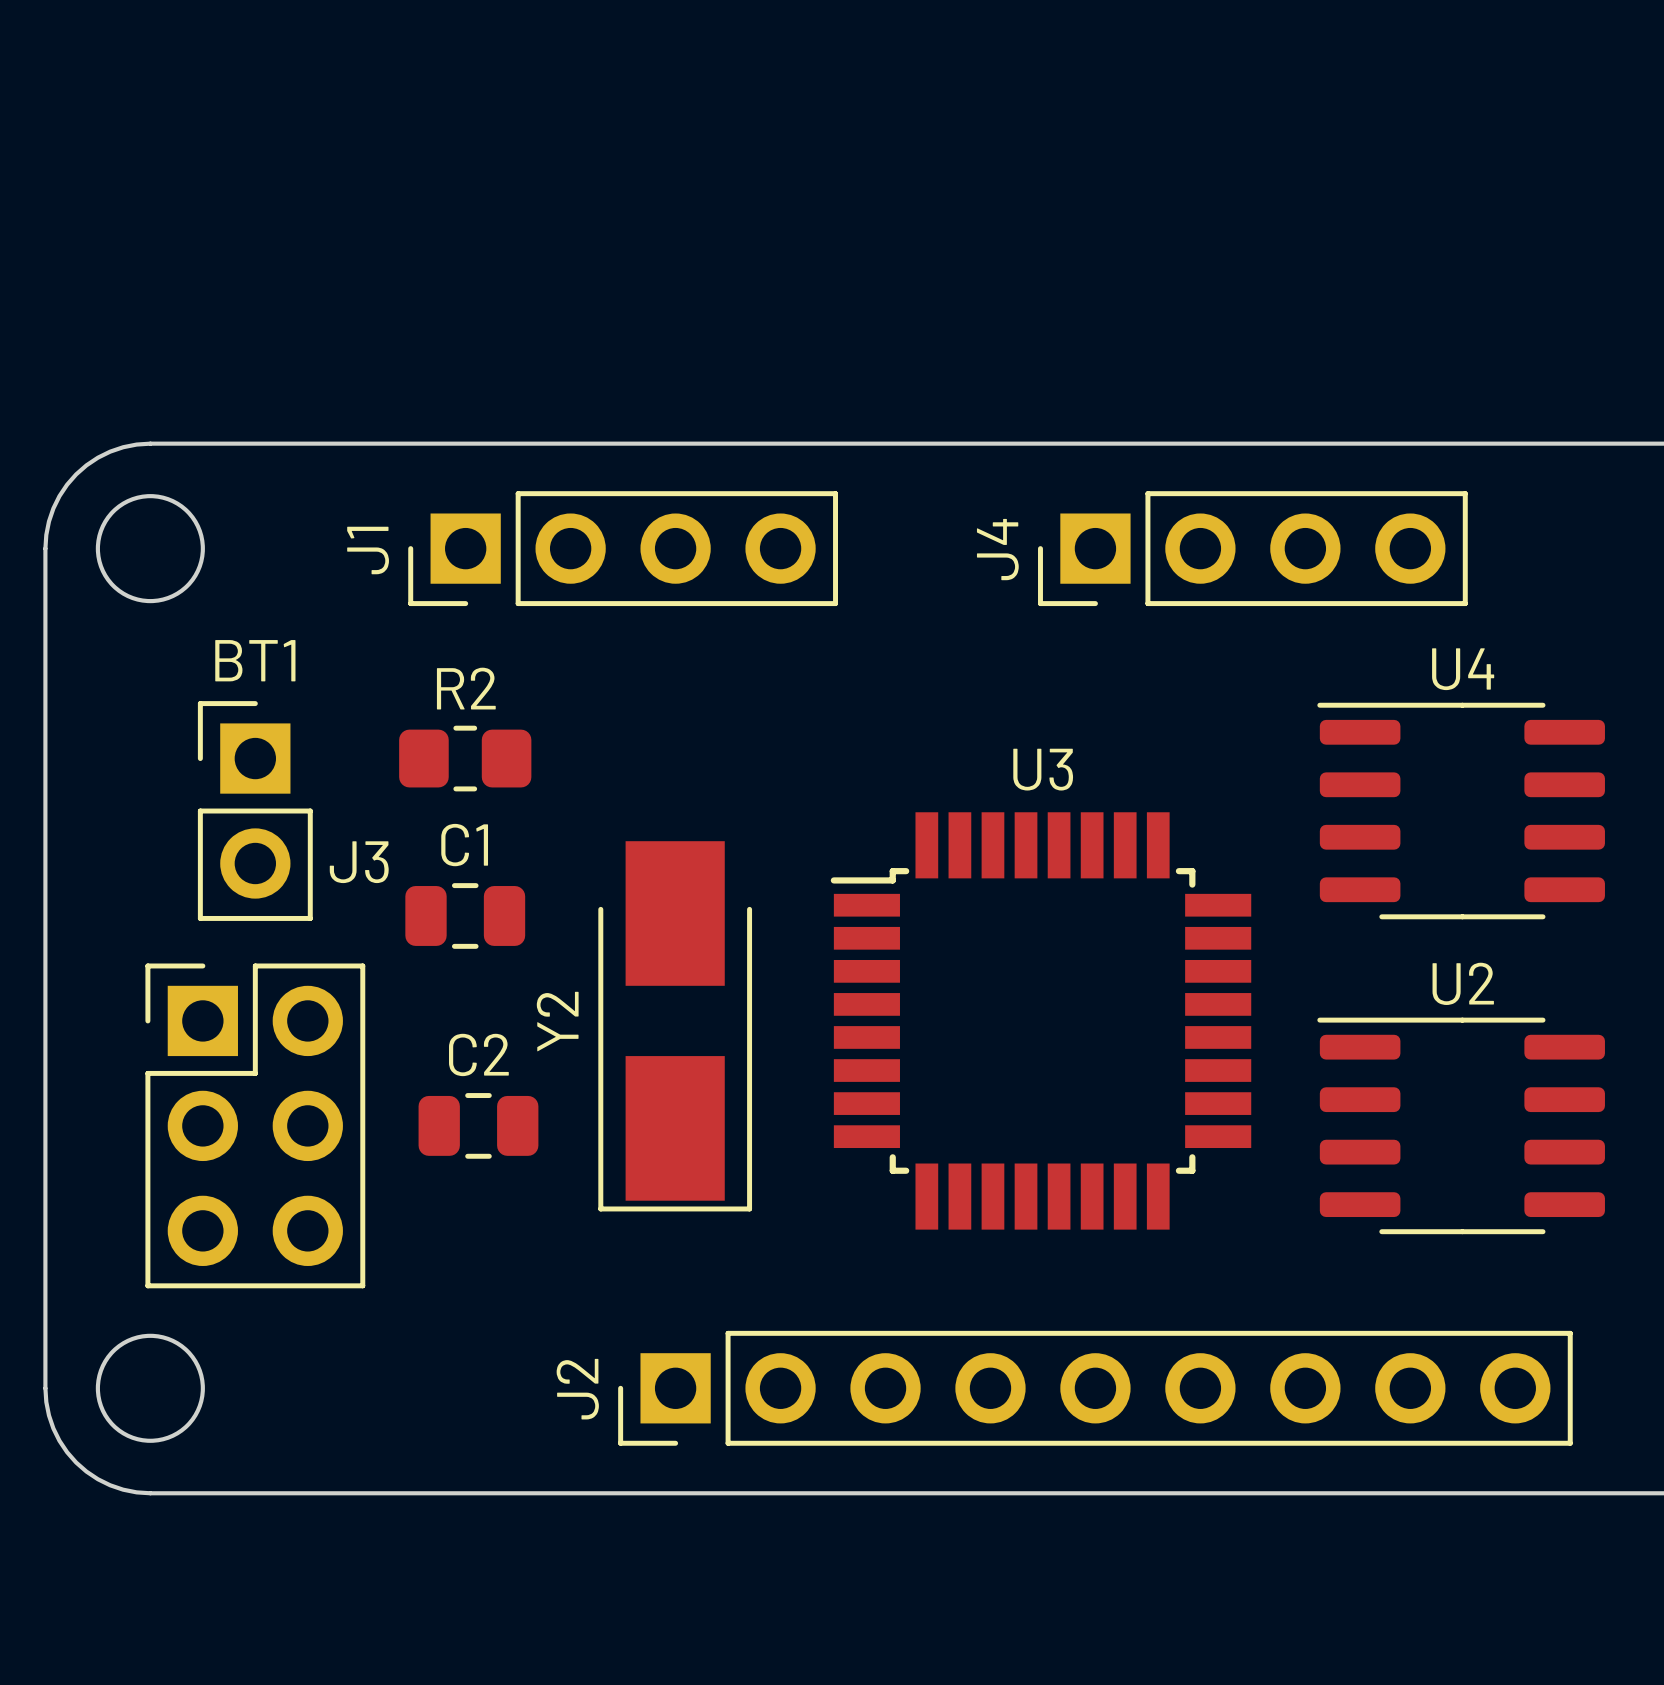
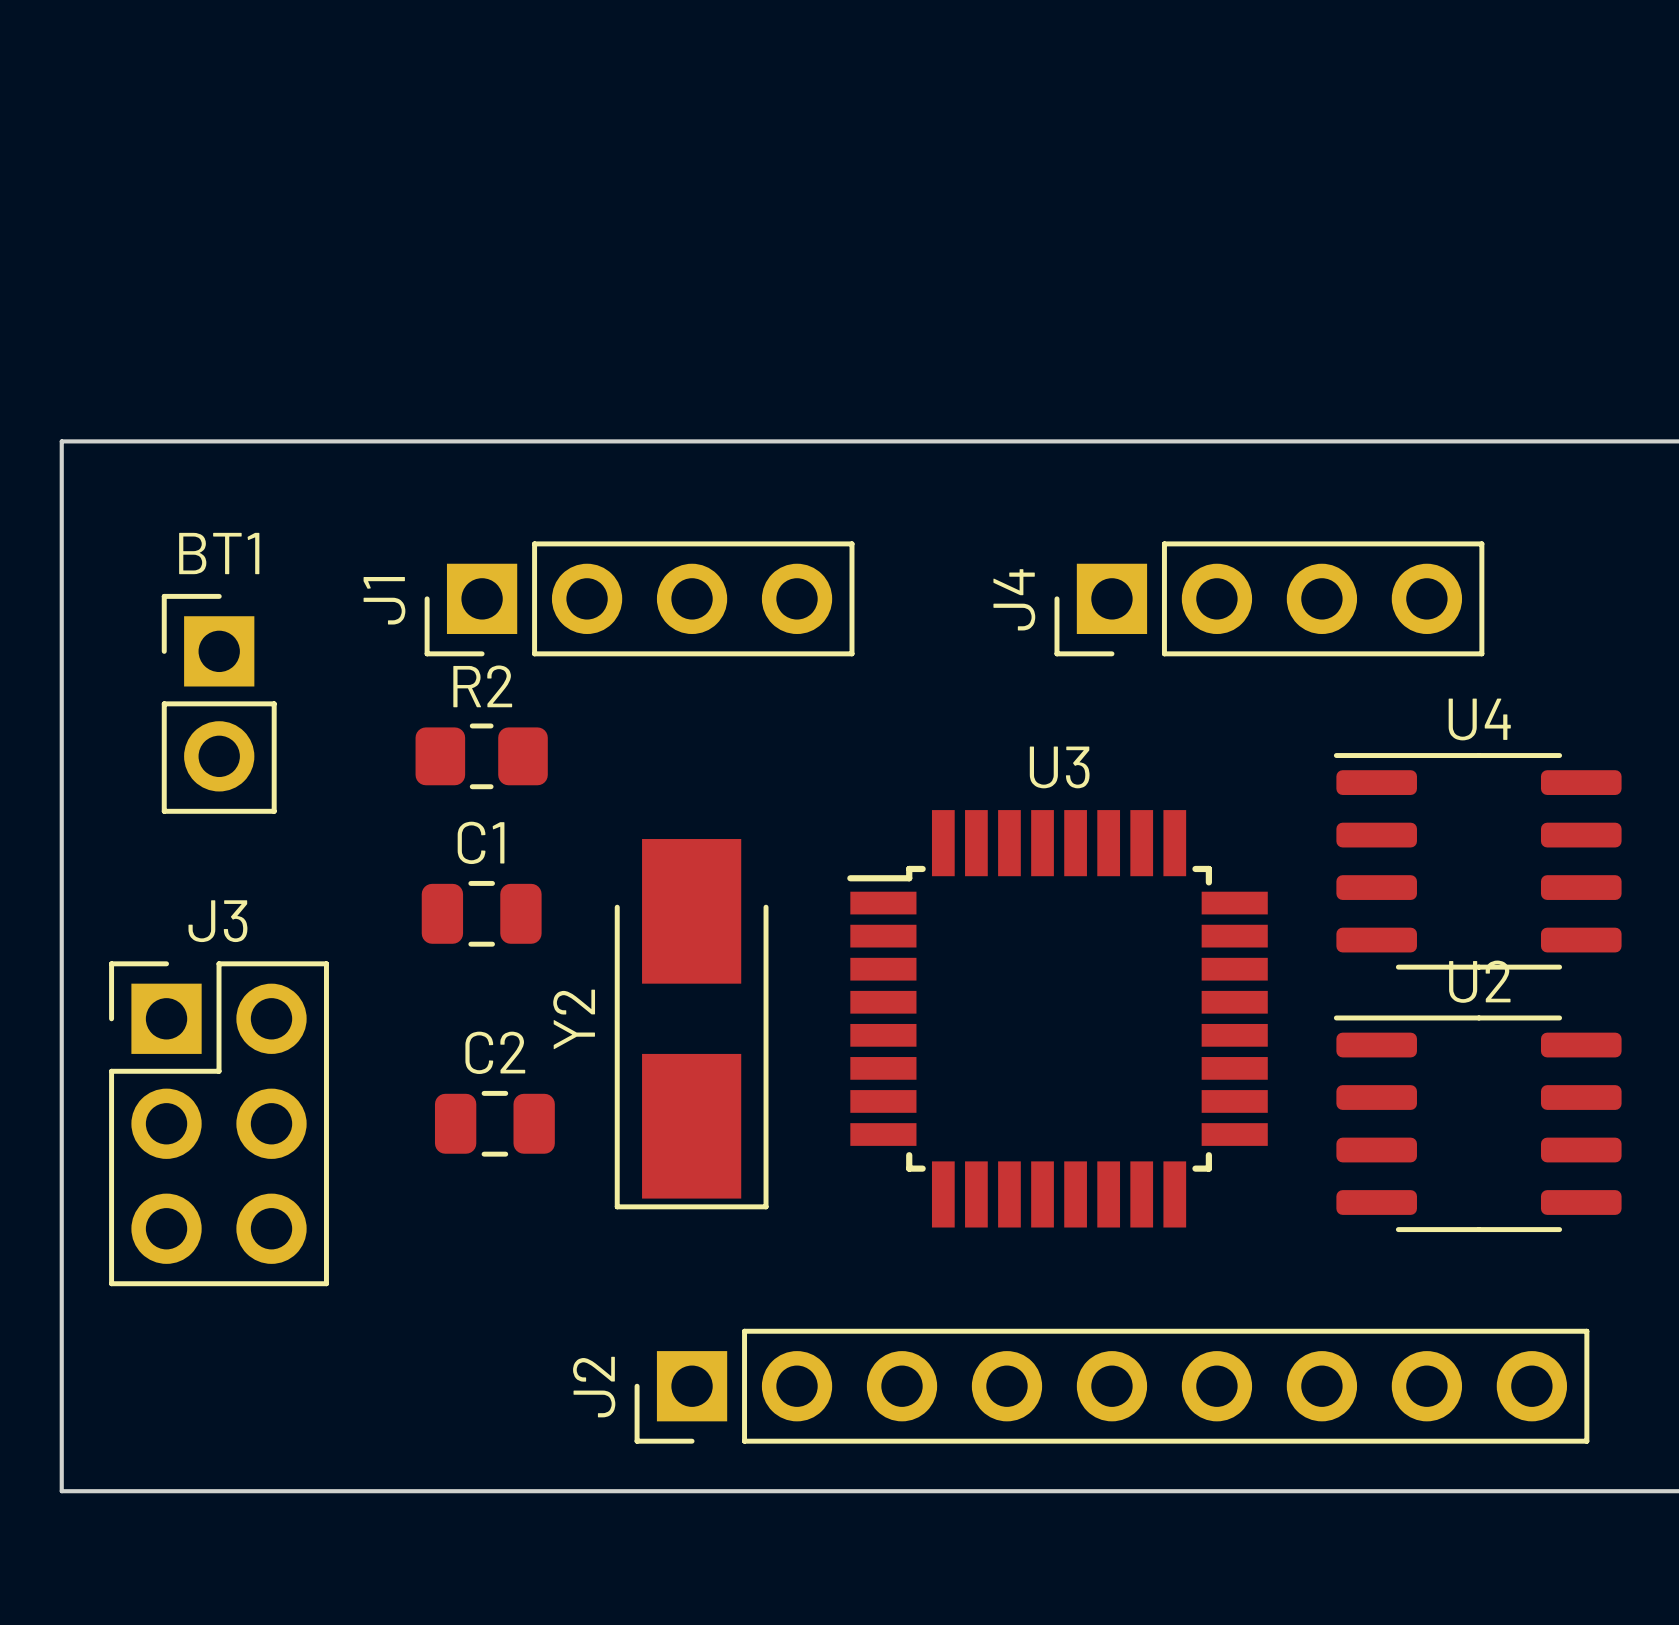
board edge: (150, 443) (123, 447) (110, 451) (86, 465) (76, 474) (67, 484) (53, 508) (48, 521) (45, 548) -> (166, 441) (61, 441) (61, 546)
round board edge: [95, 494, 205, 604] -> none
J1 position: (623, 548) -> (639, 598)
J4 position: (1252, 548) -> (1269, 598)
BT1 position: (255, 811) -> (219, 703)
U4 position: (1461, 811) -> (1477, 861)
J3 name position: J3 (359, 862) -> J3 (217, 921)
J3 position: (255, 1125) -> (219, 1123)
round board edge: [95, 1333, 205, 1443] -> none
board edge: (45, 1388) (46, 1402) (53, 1428) (59, 1440) (76, 1462) (97, 1479) (110, 1485) (123, 1489) (150, 1493) -> (61, 1386) (61, 1491) (166, 1491)

